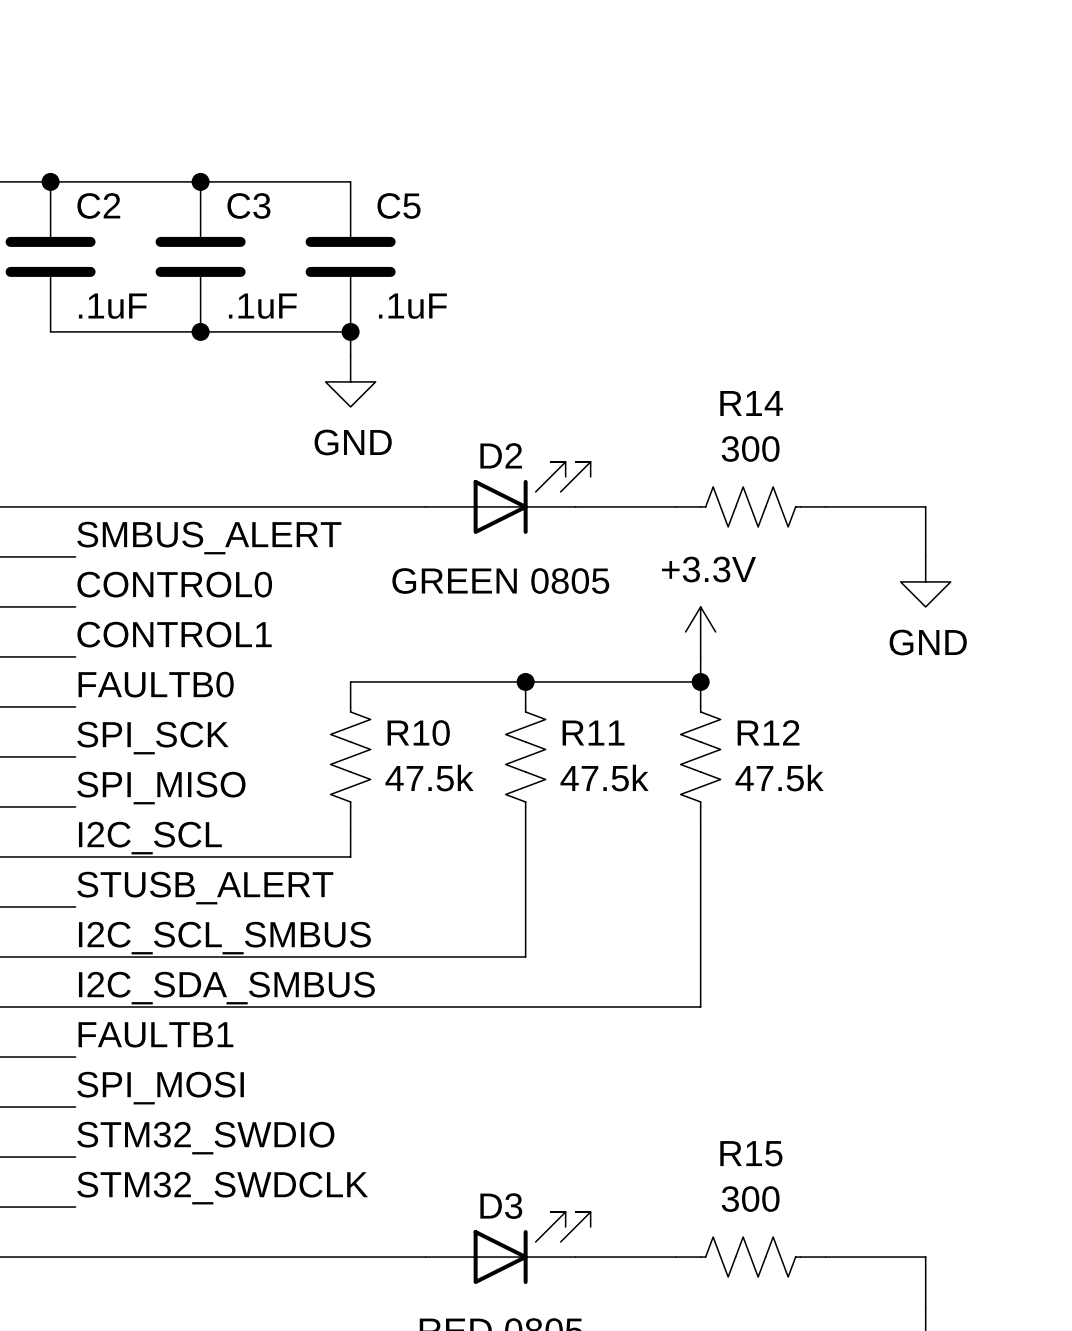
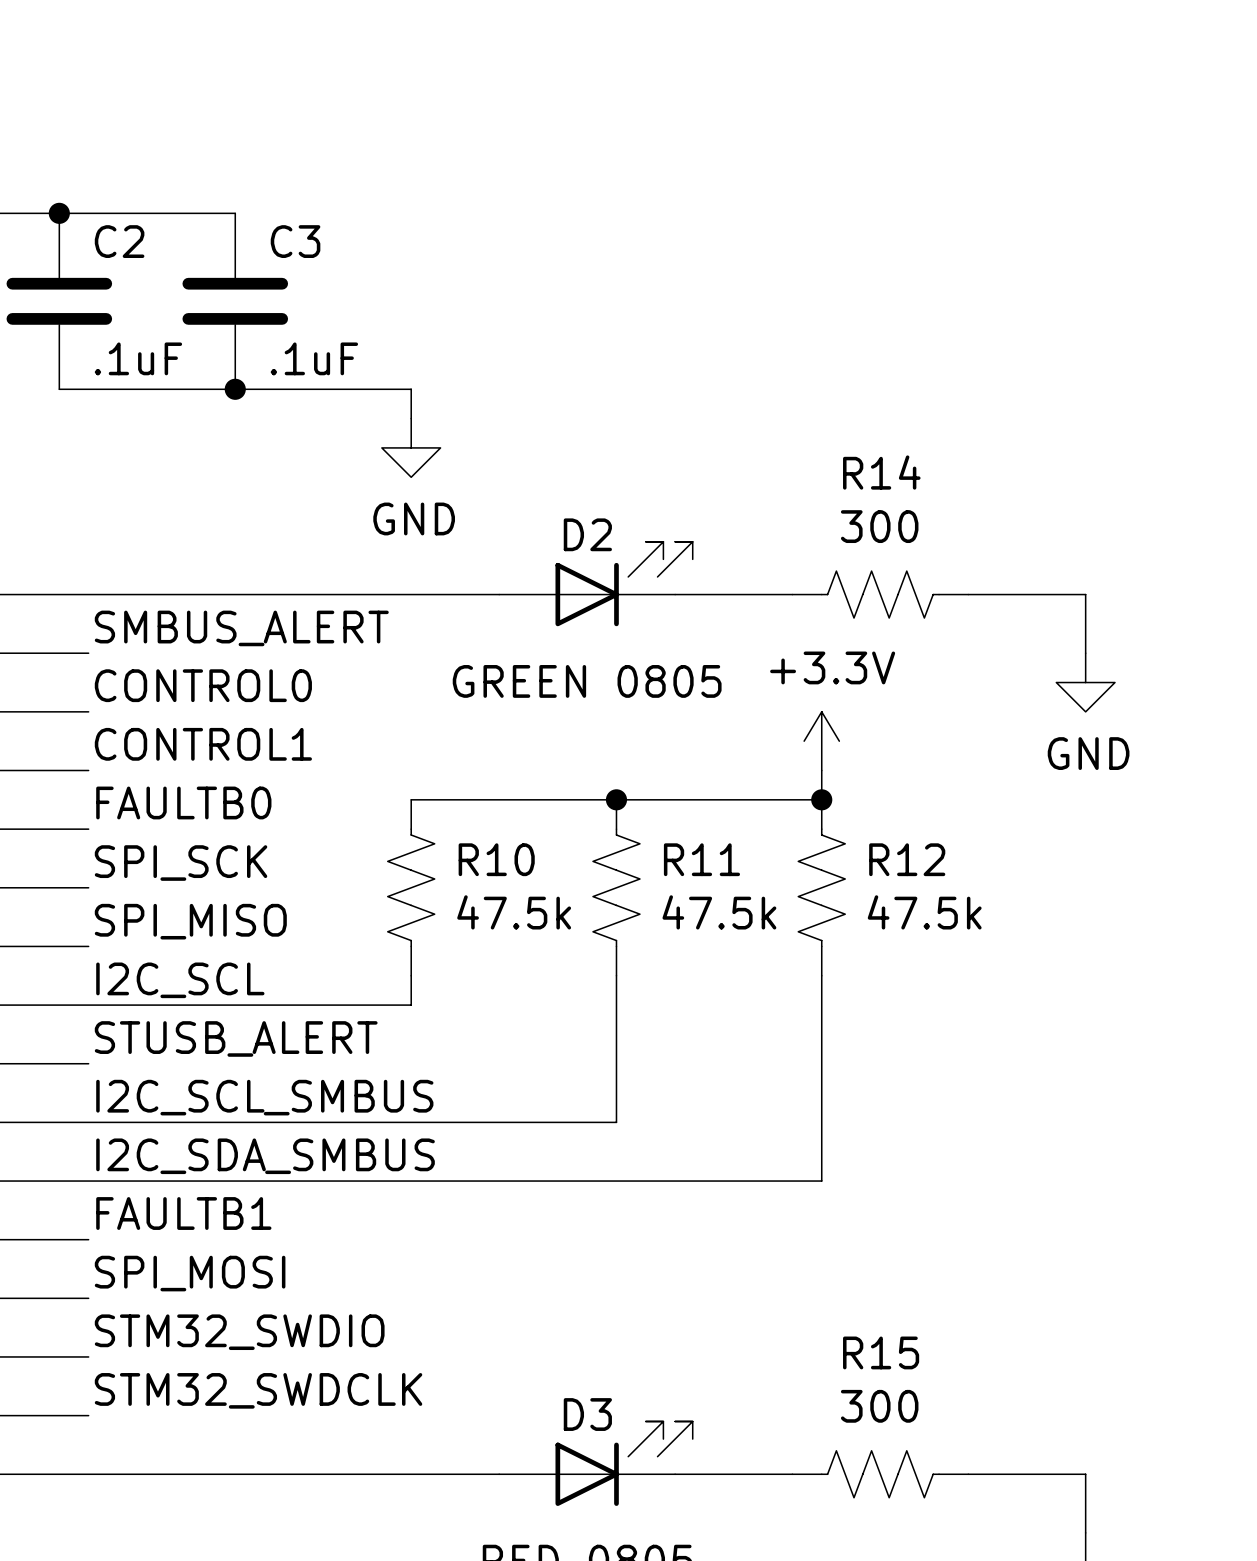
wire: (200, 181) (350, 181) -> none
junction: (200, 181) -> none
C5: .1uF (350, 256) -> none
junction: (350, 331) -> none

